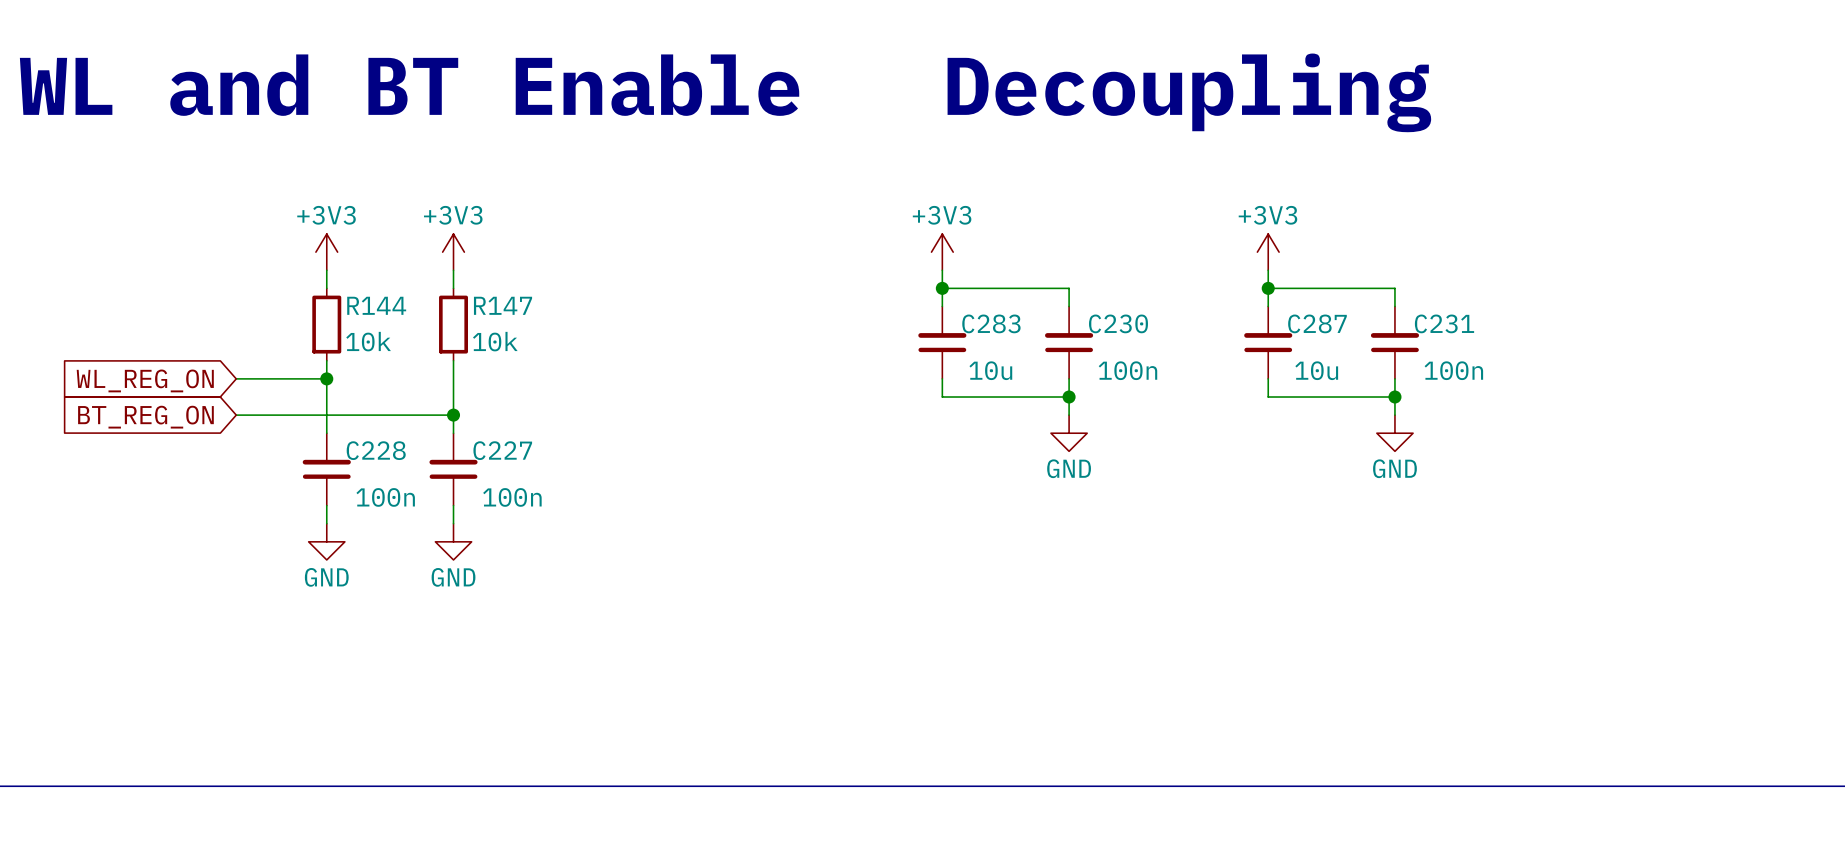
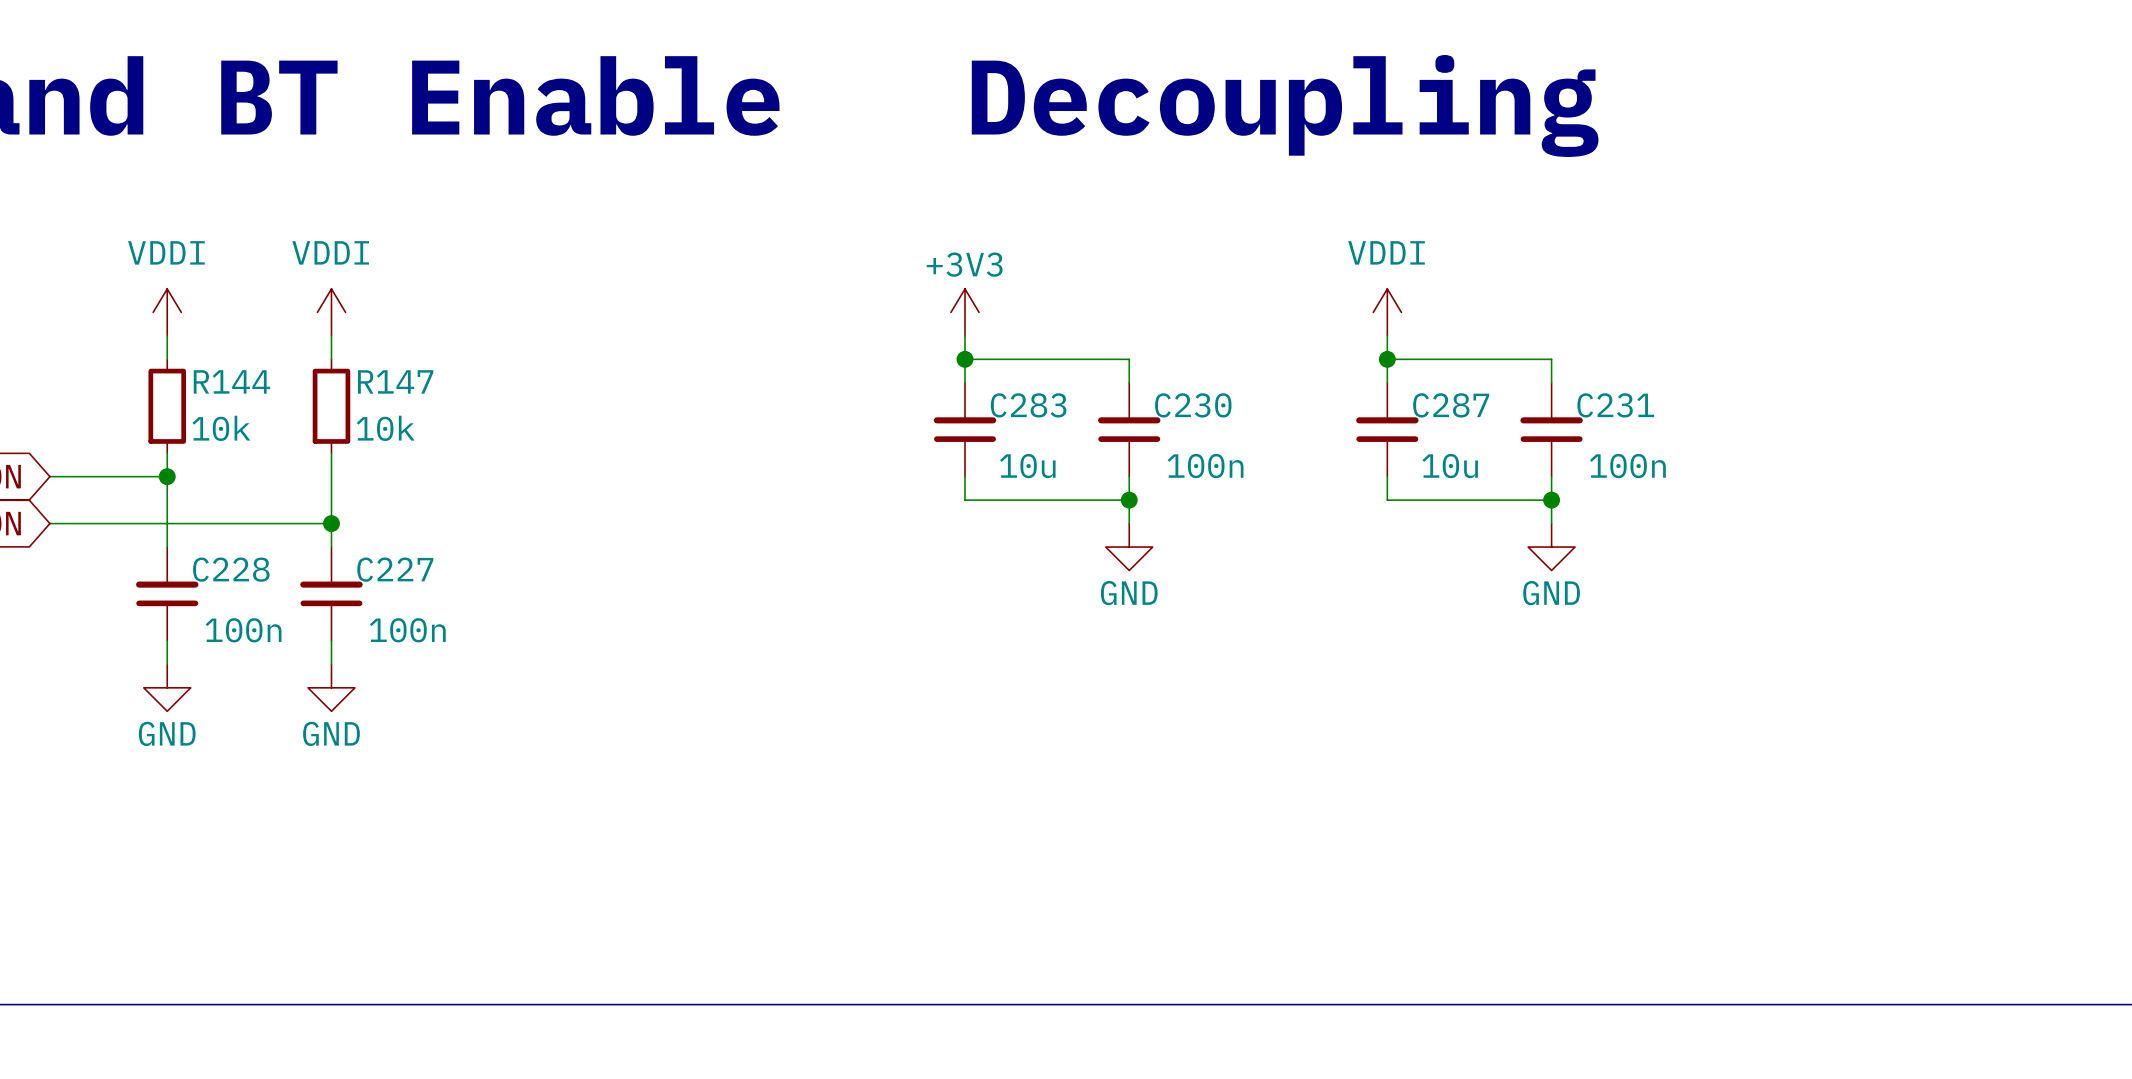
power symbol: +3V3 (326, 252) -> VDDI (167, 312)
power symbol: +3V3 (453, 252) -> VDDI (331, 312)
power symbol: +3V3 (1268, 252) -> VDDI (1387, 312)

